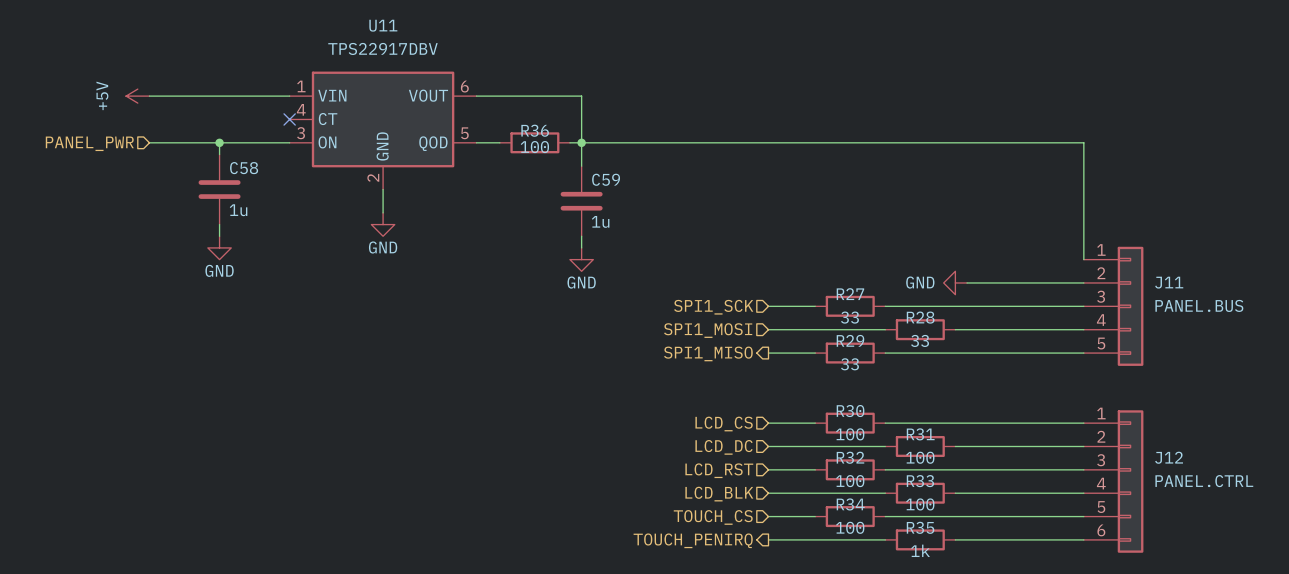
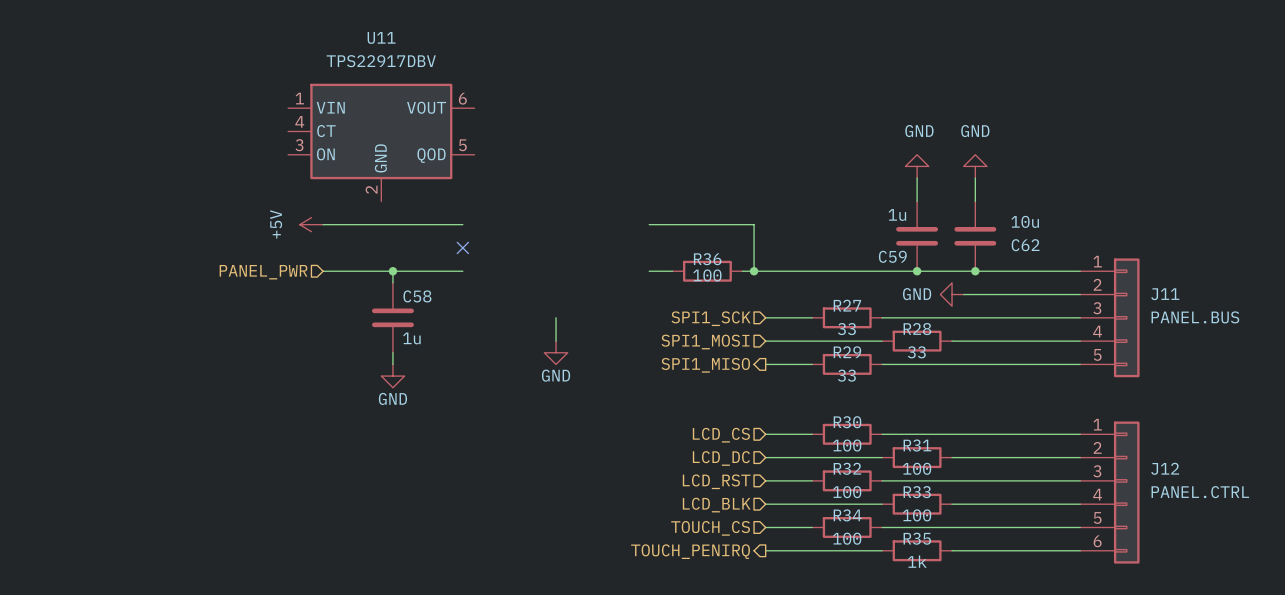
power symbol position: +5V (137, 96) -> +5V (311, 224)
wire: (149, 96) (289, 96) -> (323, 224) (462, 224)
wire: (476, 96) (581, 96) (581, 166) -> none
no-connect mark: (289, 119) -> none
wire: (149, 142) (289, 142) -> (323, 271) (462, 271)
wire: (219, 142) (219, 154) -> (392, 271) (392, 282)
junction: (219, 142) -> none
wire: (476, 142) (499, 142) -> (649, 271) (672, 271)
R36 position: (534, 142) -> (707, 271)
wire: (569, 142) (1083, 142) (1083, 259) -> (742, 271) (1080, 271)
junction: (581, 142) -> none
hierarchical label position: PANEL_PWR (89, 143) -> PANEL_PWR (263, 272)
power symbol: none -> GND (917, 166)
power symbol: none -> GND (975, 166)
wire: none -> (917, 178) (917, 201)
wire: none -> (975, 178) (975, 201)
C59 name position: C59 (606, 179) -> C59 (892, 256)
C58 position: (219, 189) -> (392, 317)
wire: (383, 189) (383, 212) -> (556, 317) (556, 341)
C59 position: (581, 201) -> (917, 236)
wire: none -> (649, 224) (754, 224) (754, 271)
C59 value position: 1u (600, 221) -> 1u (897, 215)
wire: (219, 224) (219, 236) -> (392, 352) (392, 364)
power symbol: GND (383, 224) -> none
C62: none -> 10u (975, 236)
no-connect mark: none -> (462, 247)
wire: (581, 236) (581, 247) -> none
power symbol: GND (219, 247) -> none
junction: none -> (392, 271)
power symbol position: GND (581, 259) -> GND (556, 352)
junction: none -> (754, 271)
junction: none -> (917, 271)
junction: none -> (975, 271)
power symbol: none -> GND (392, 376)

